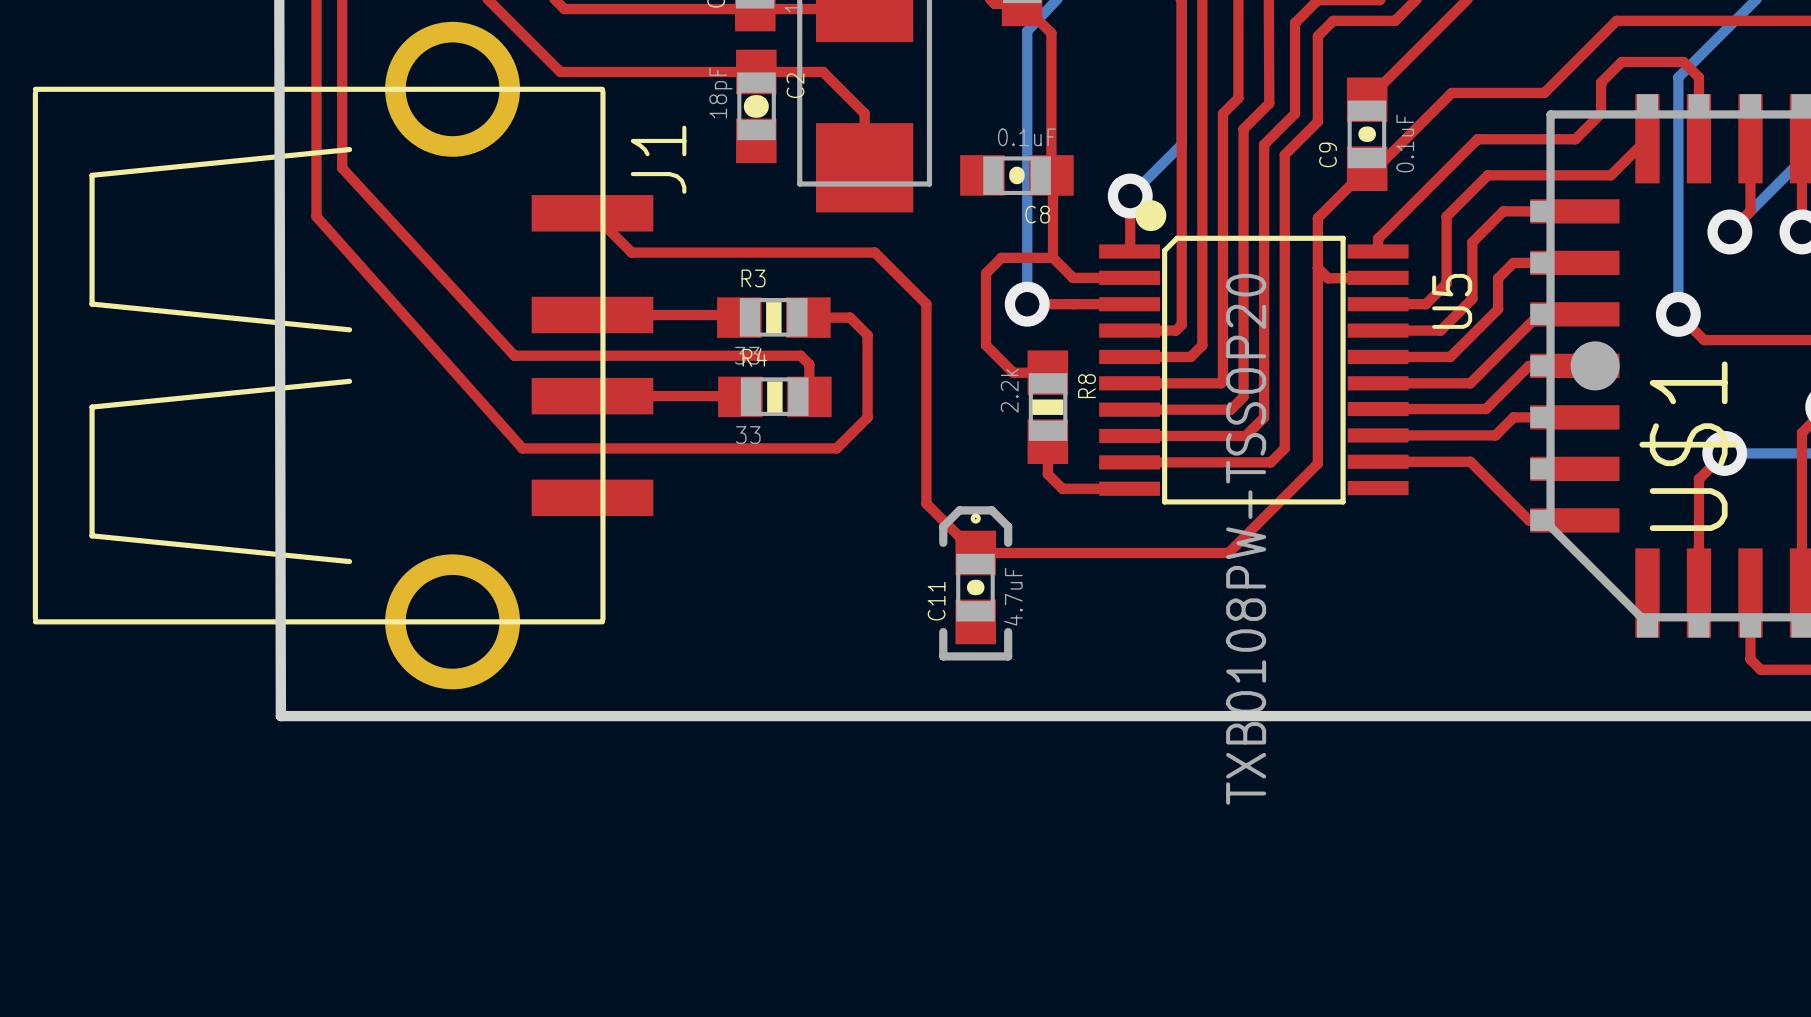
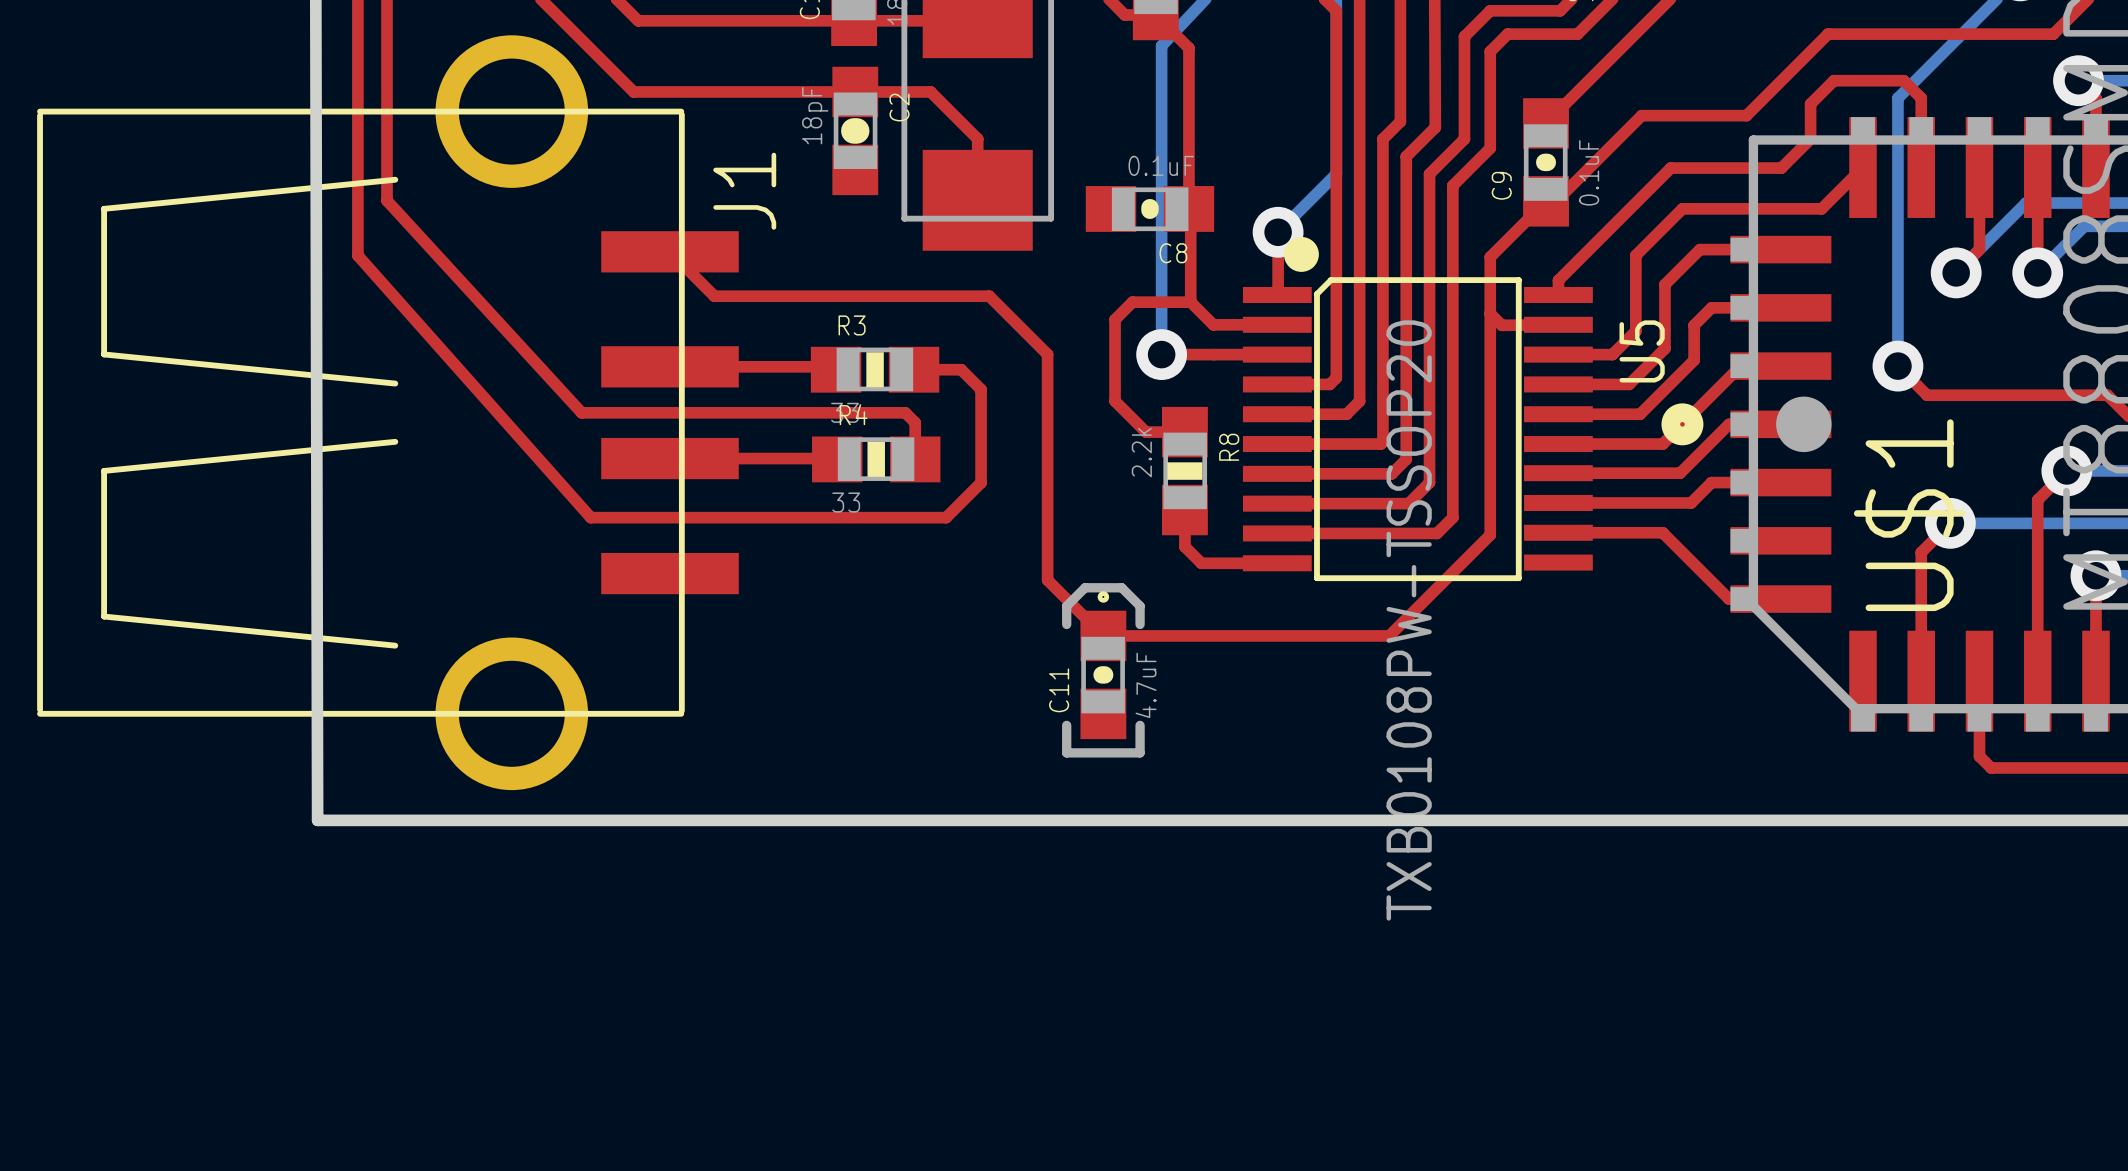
drawing: none -> [1661, 403, 1704, 446]

